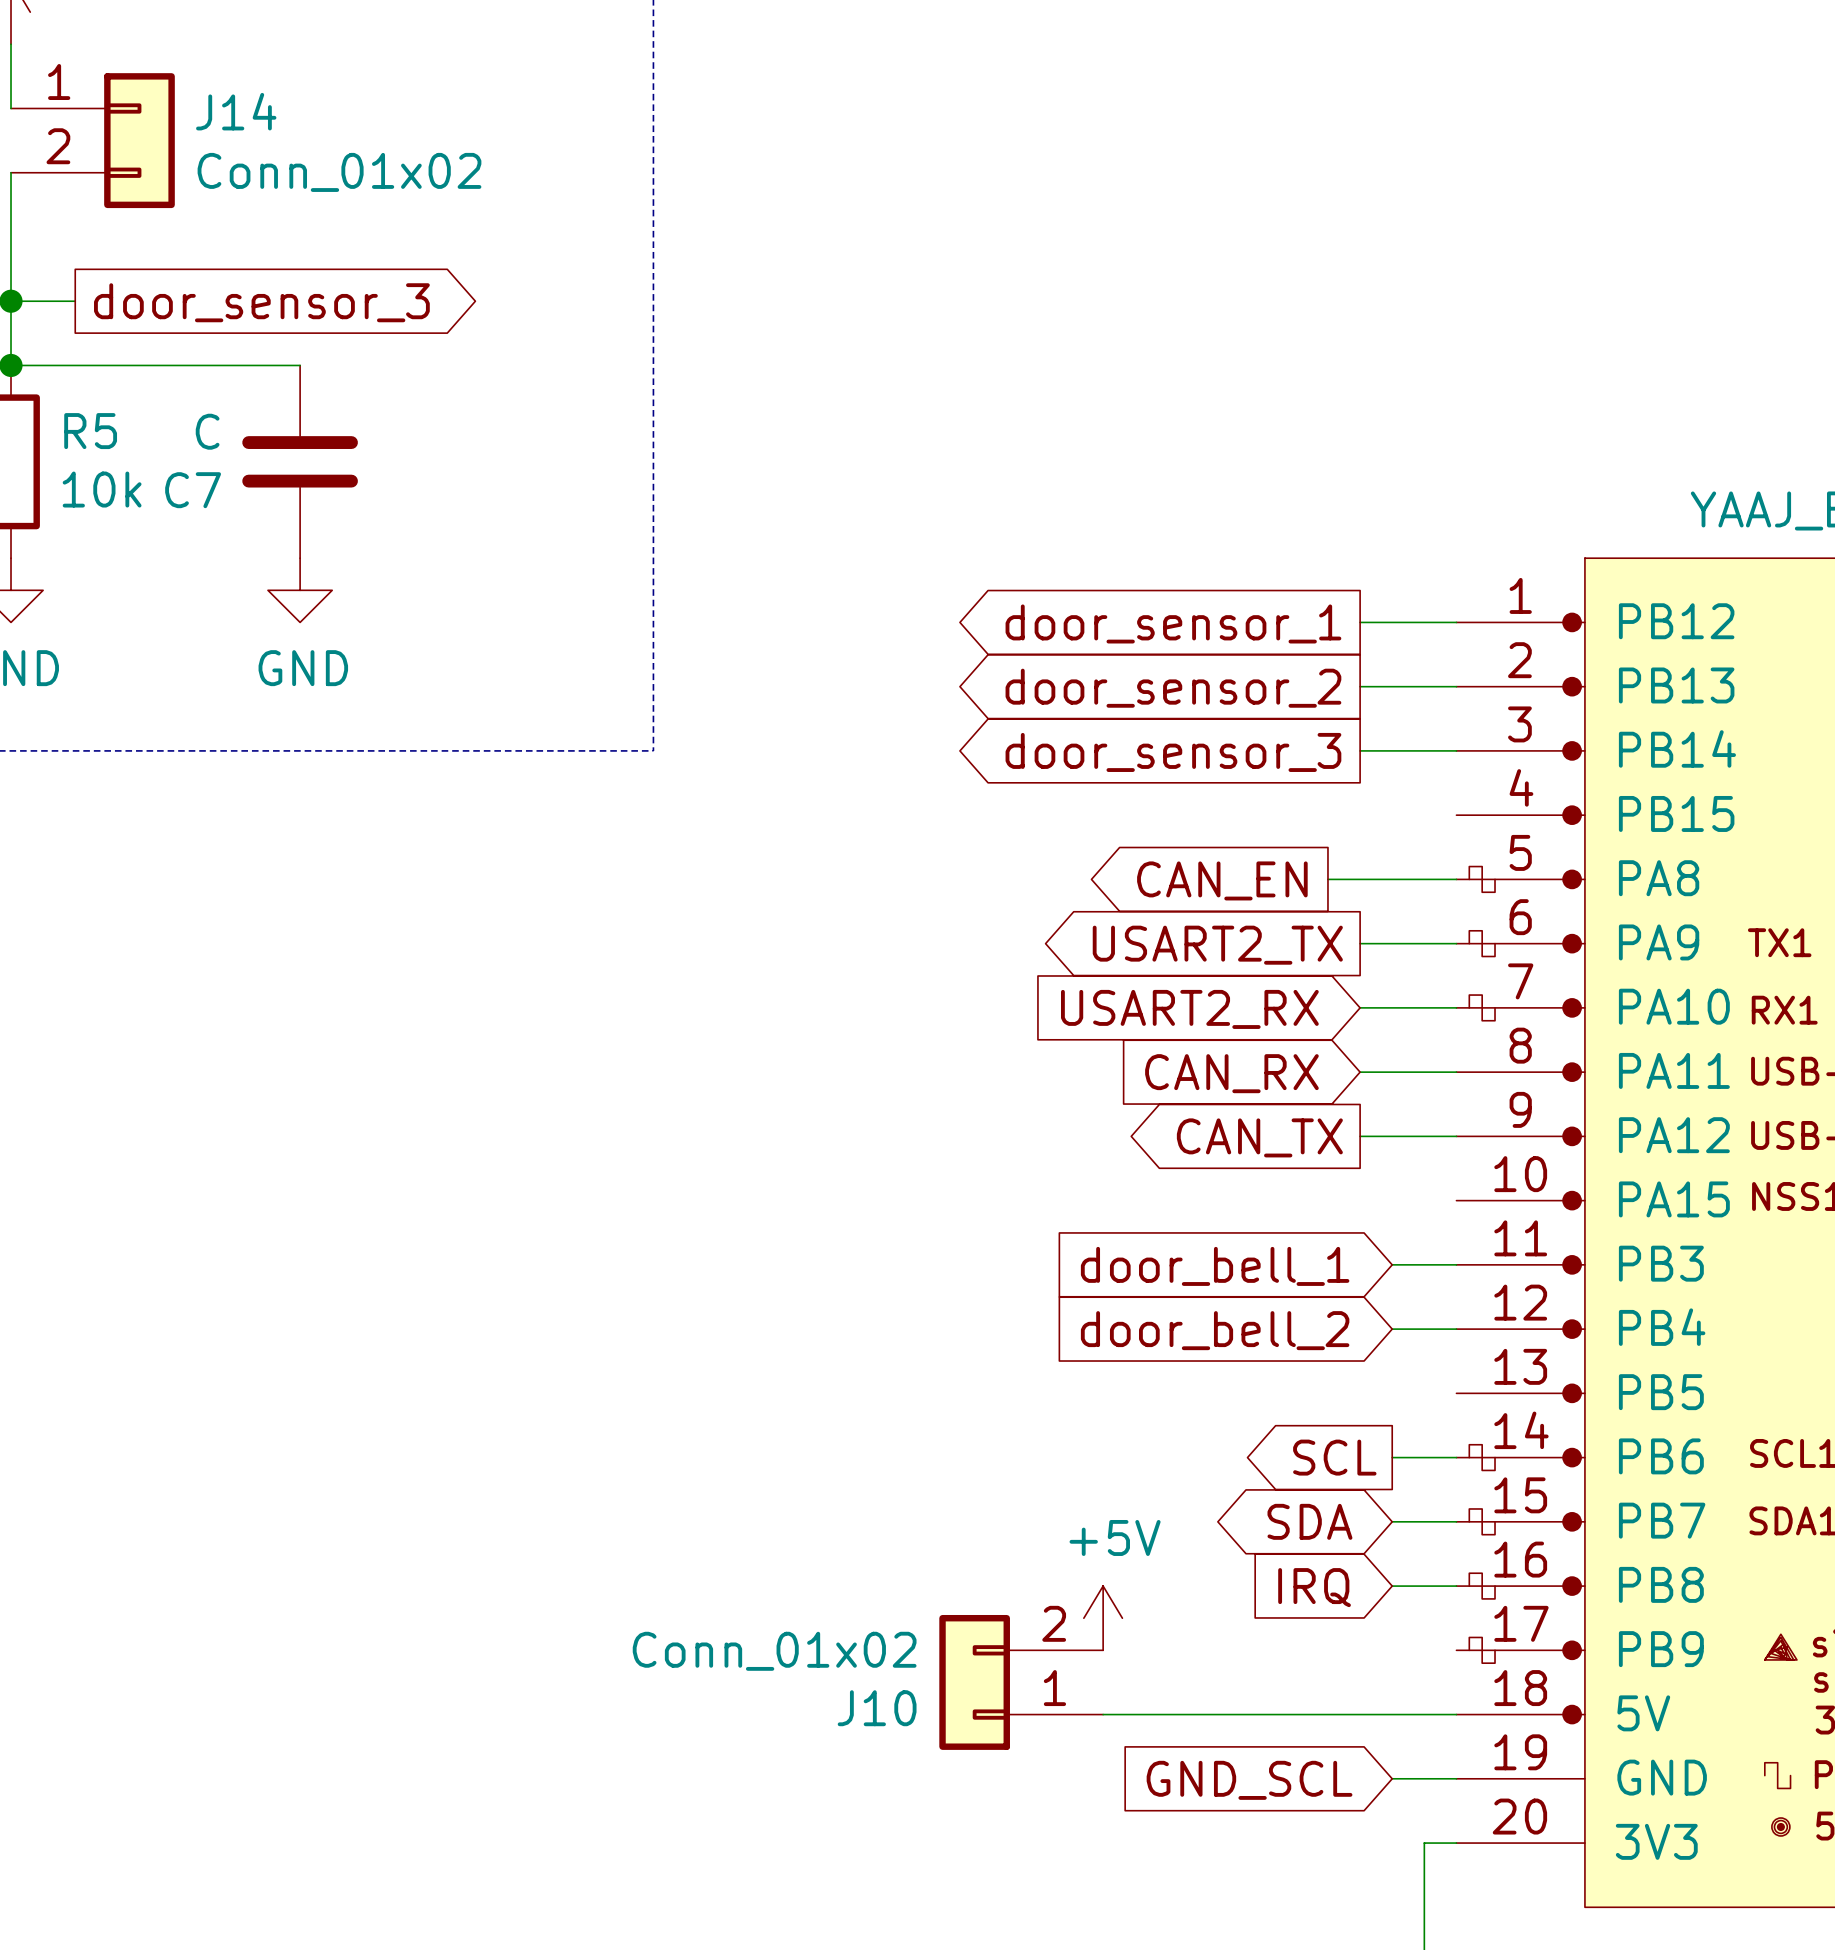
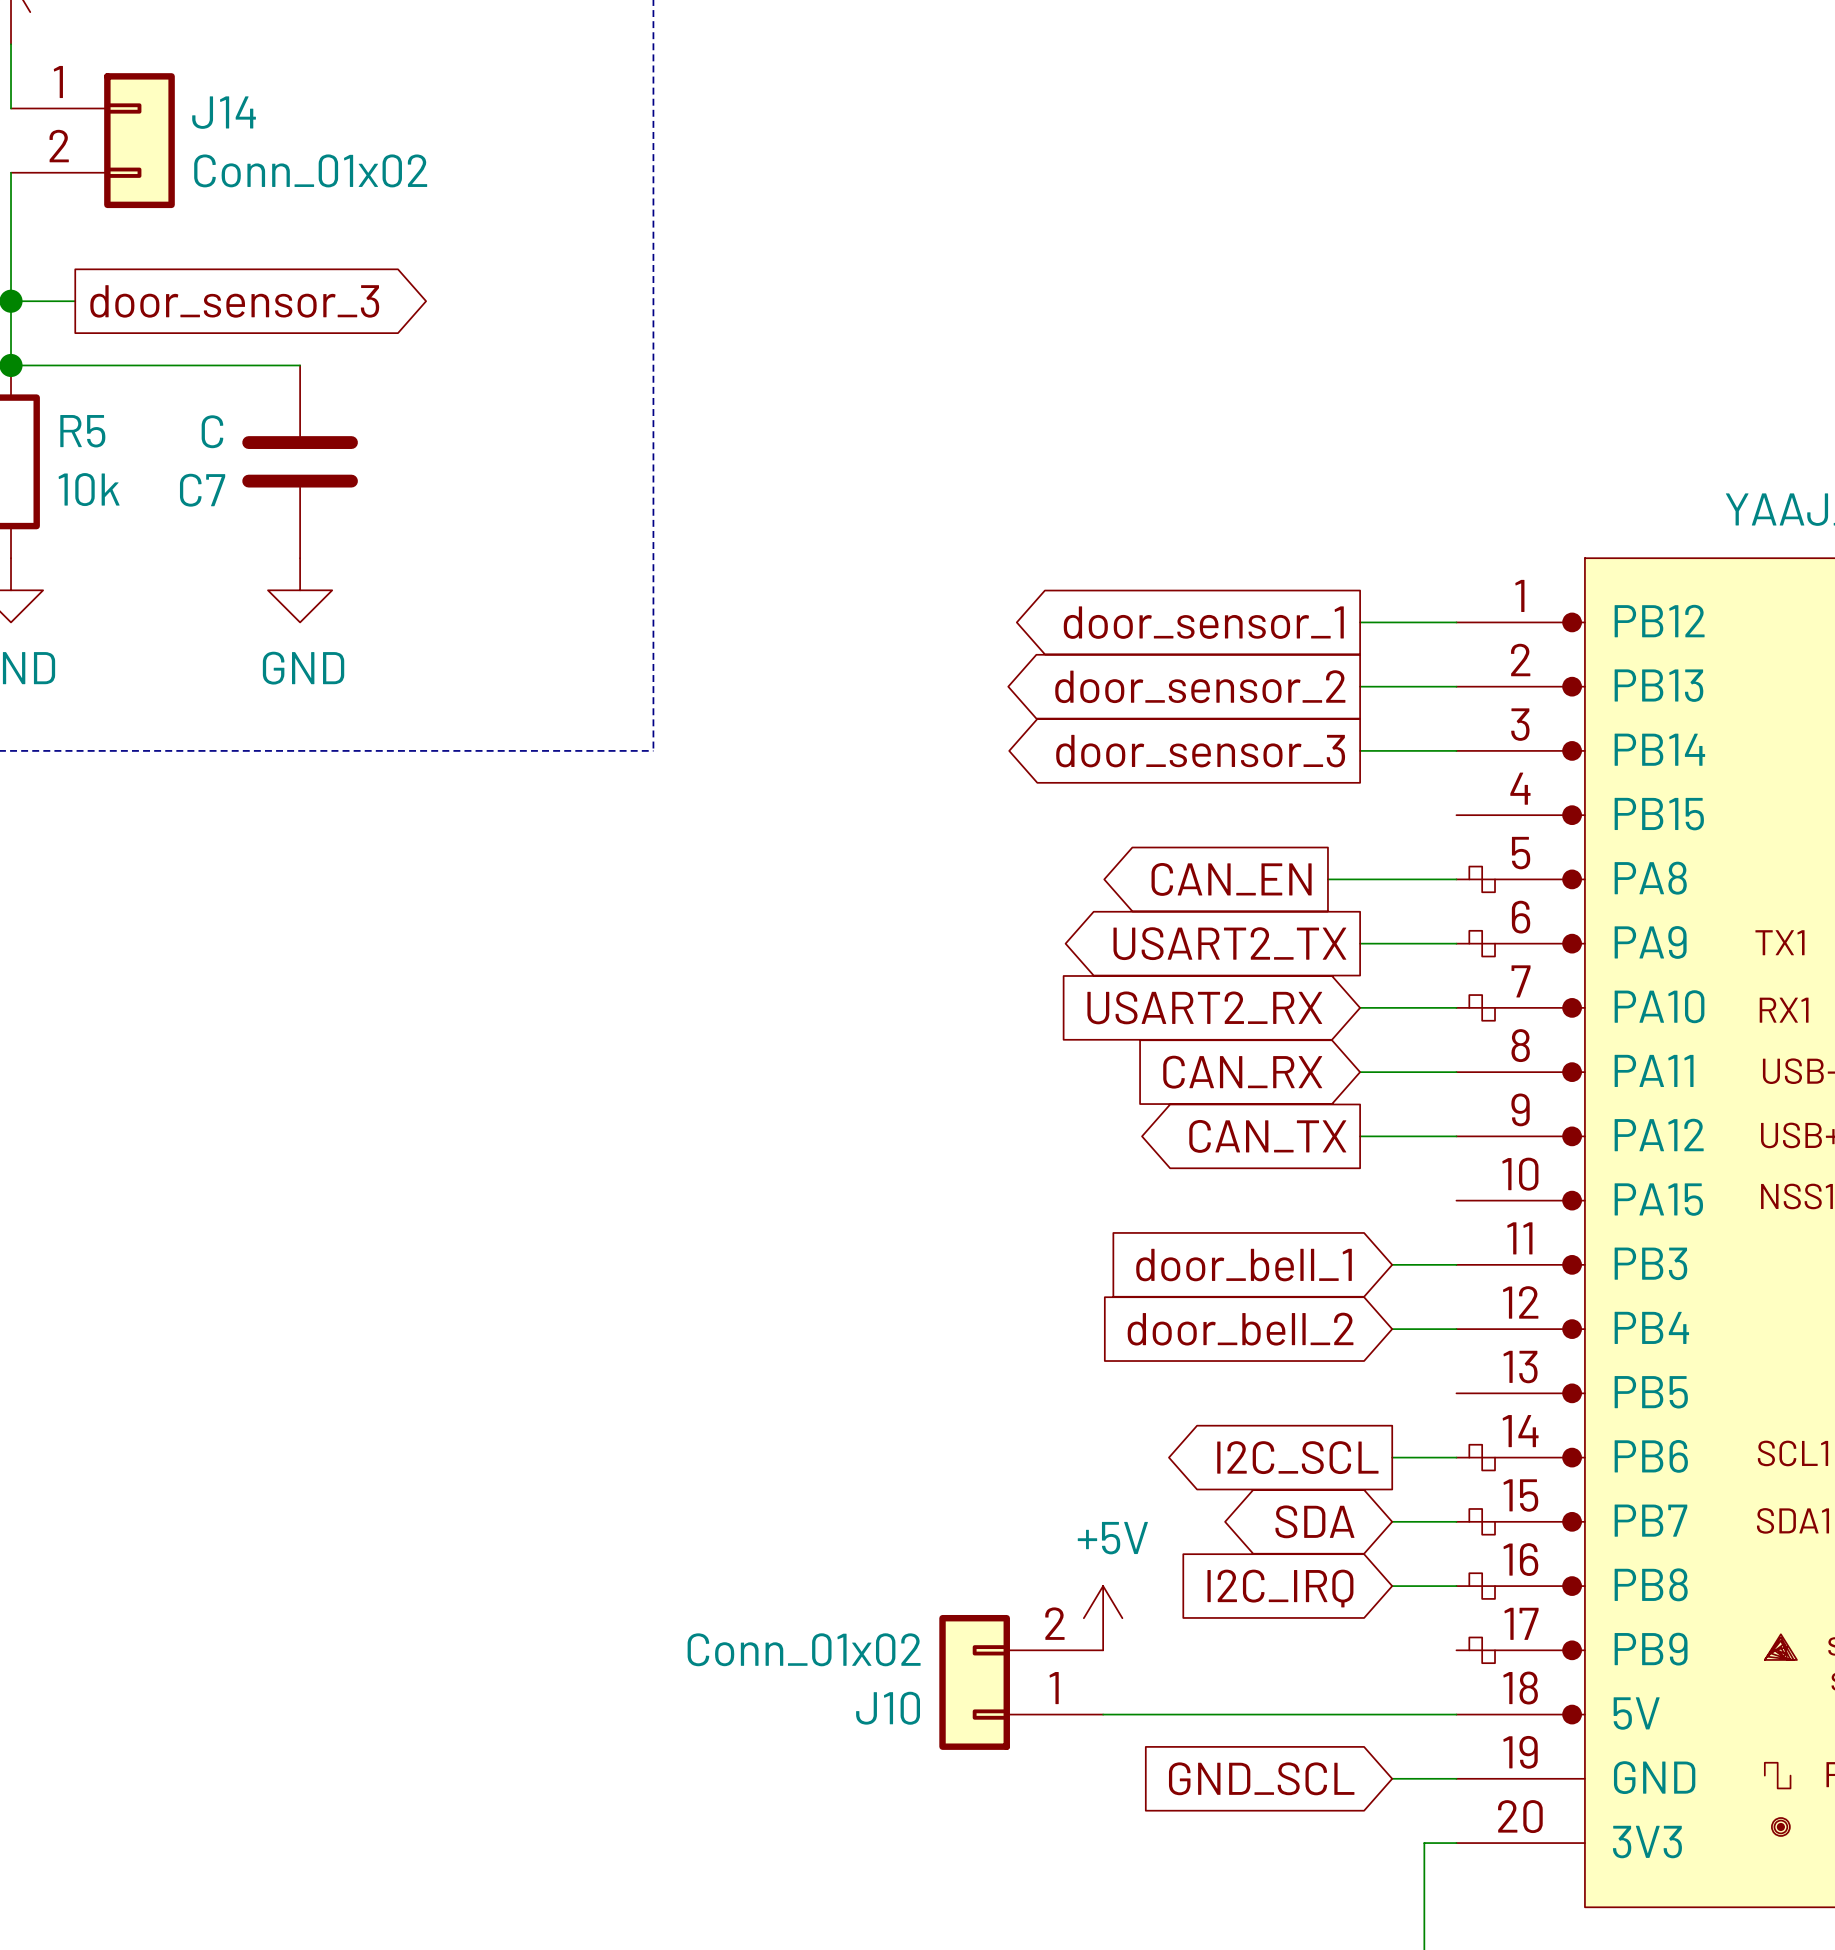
global label: SCL (1334, 1457) -> I2C_SCL (1297, 1457)
global label: IRQ (1314, 1587) -> I2C_IRQ (1280, 1588)

